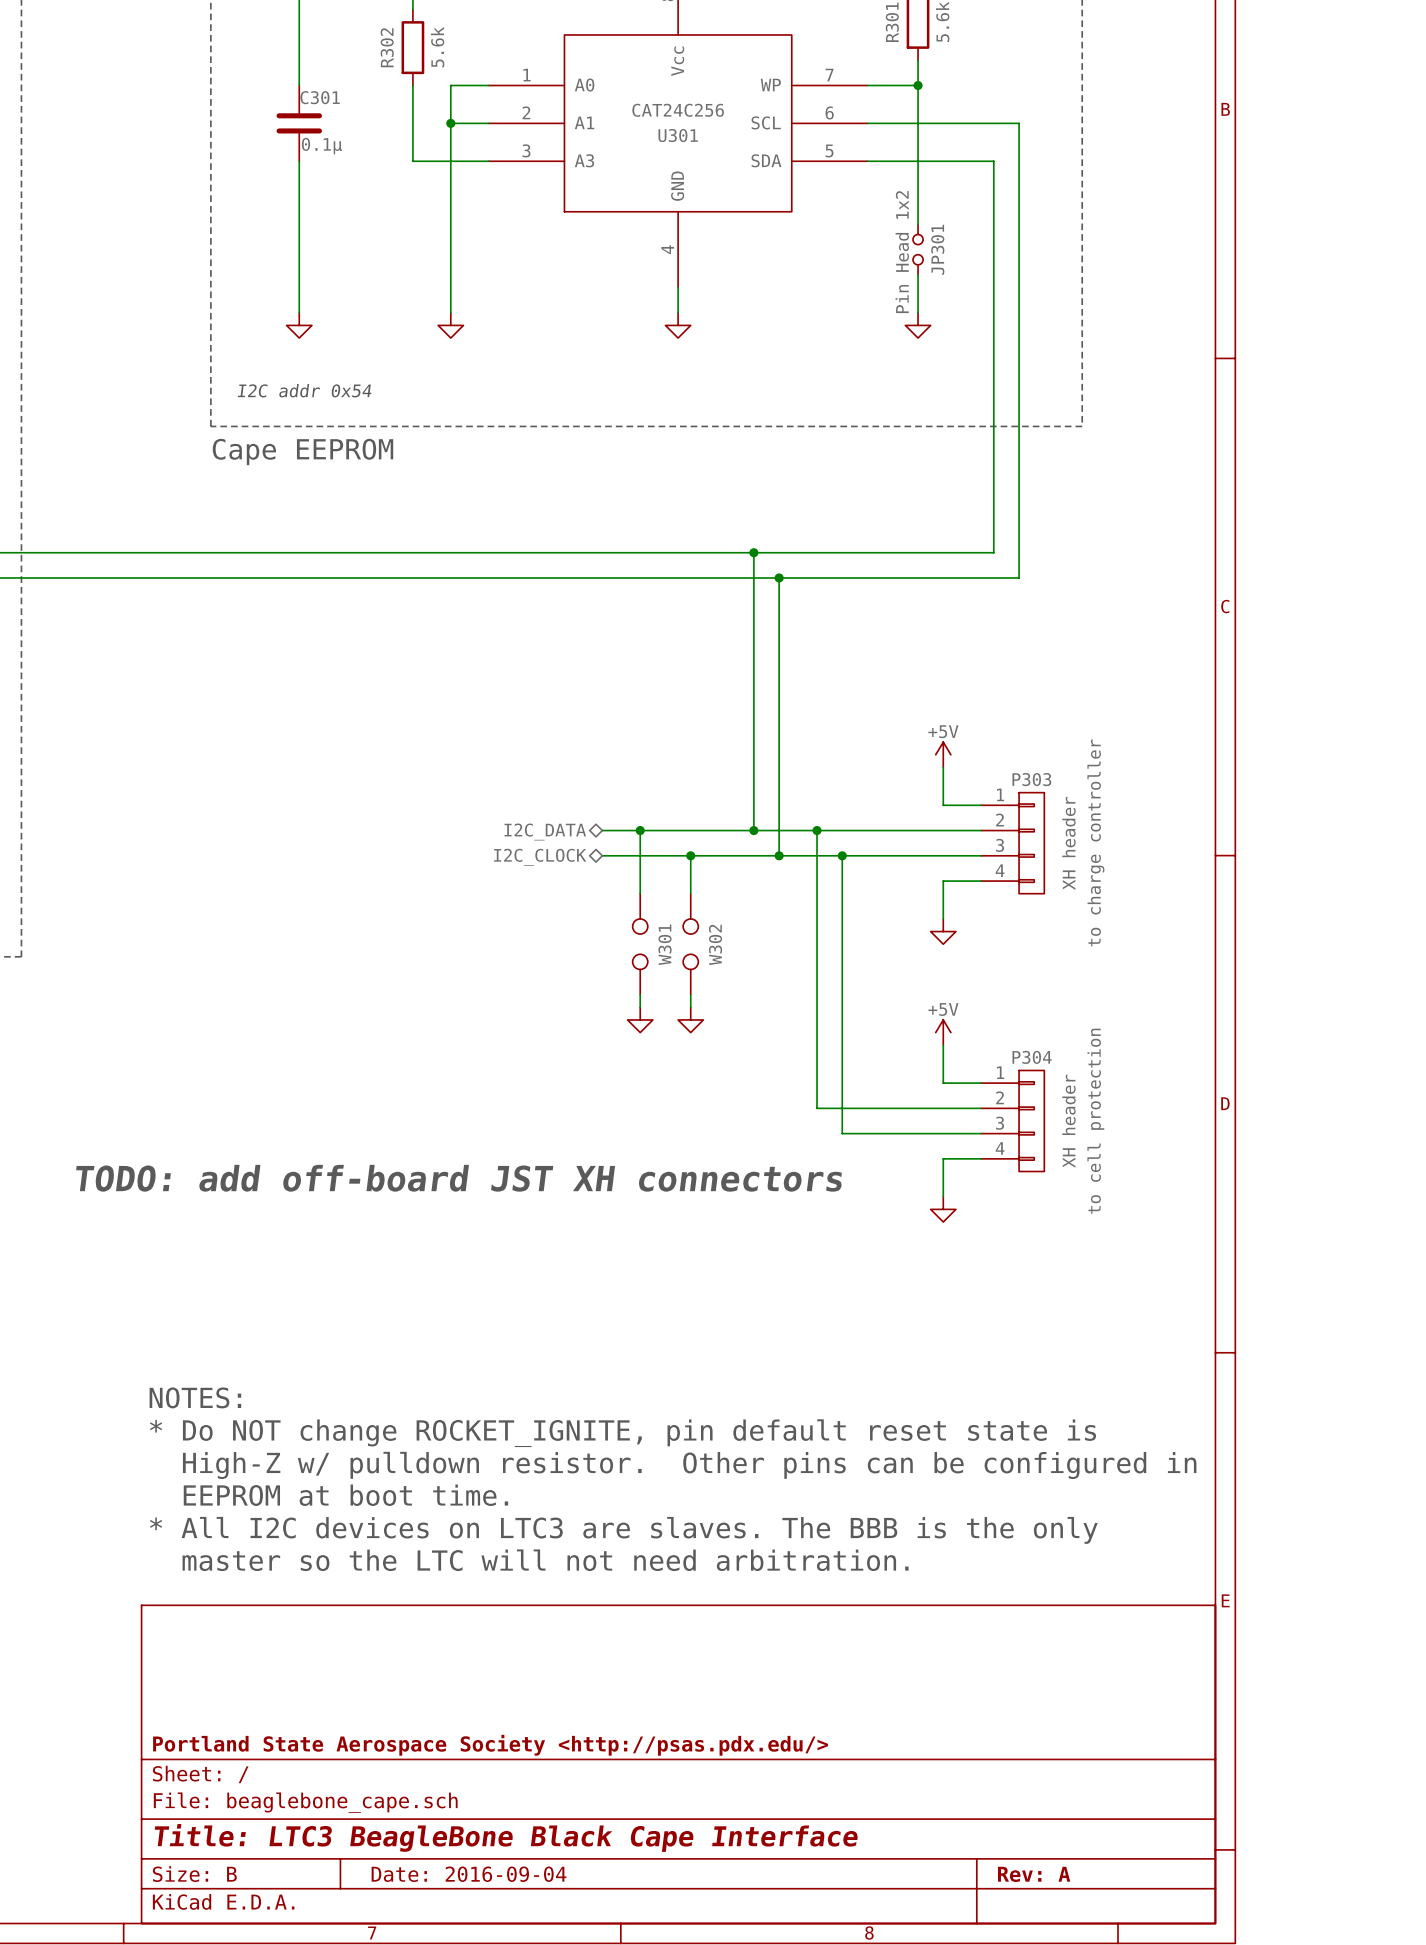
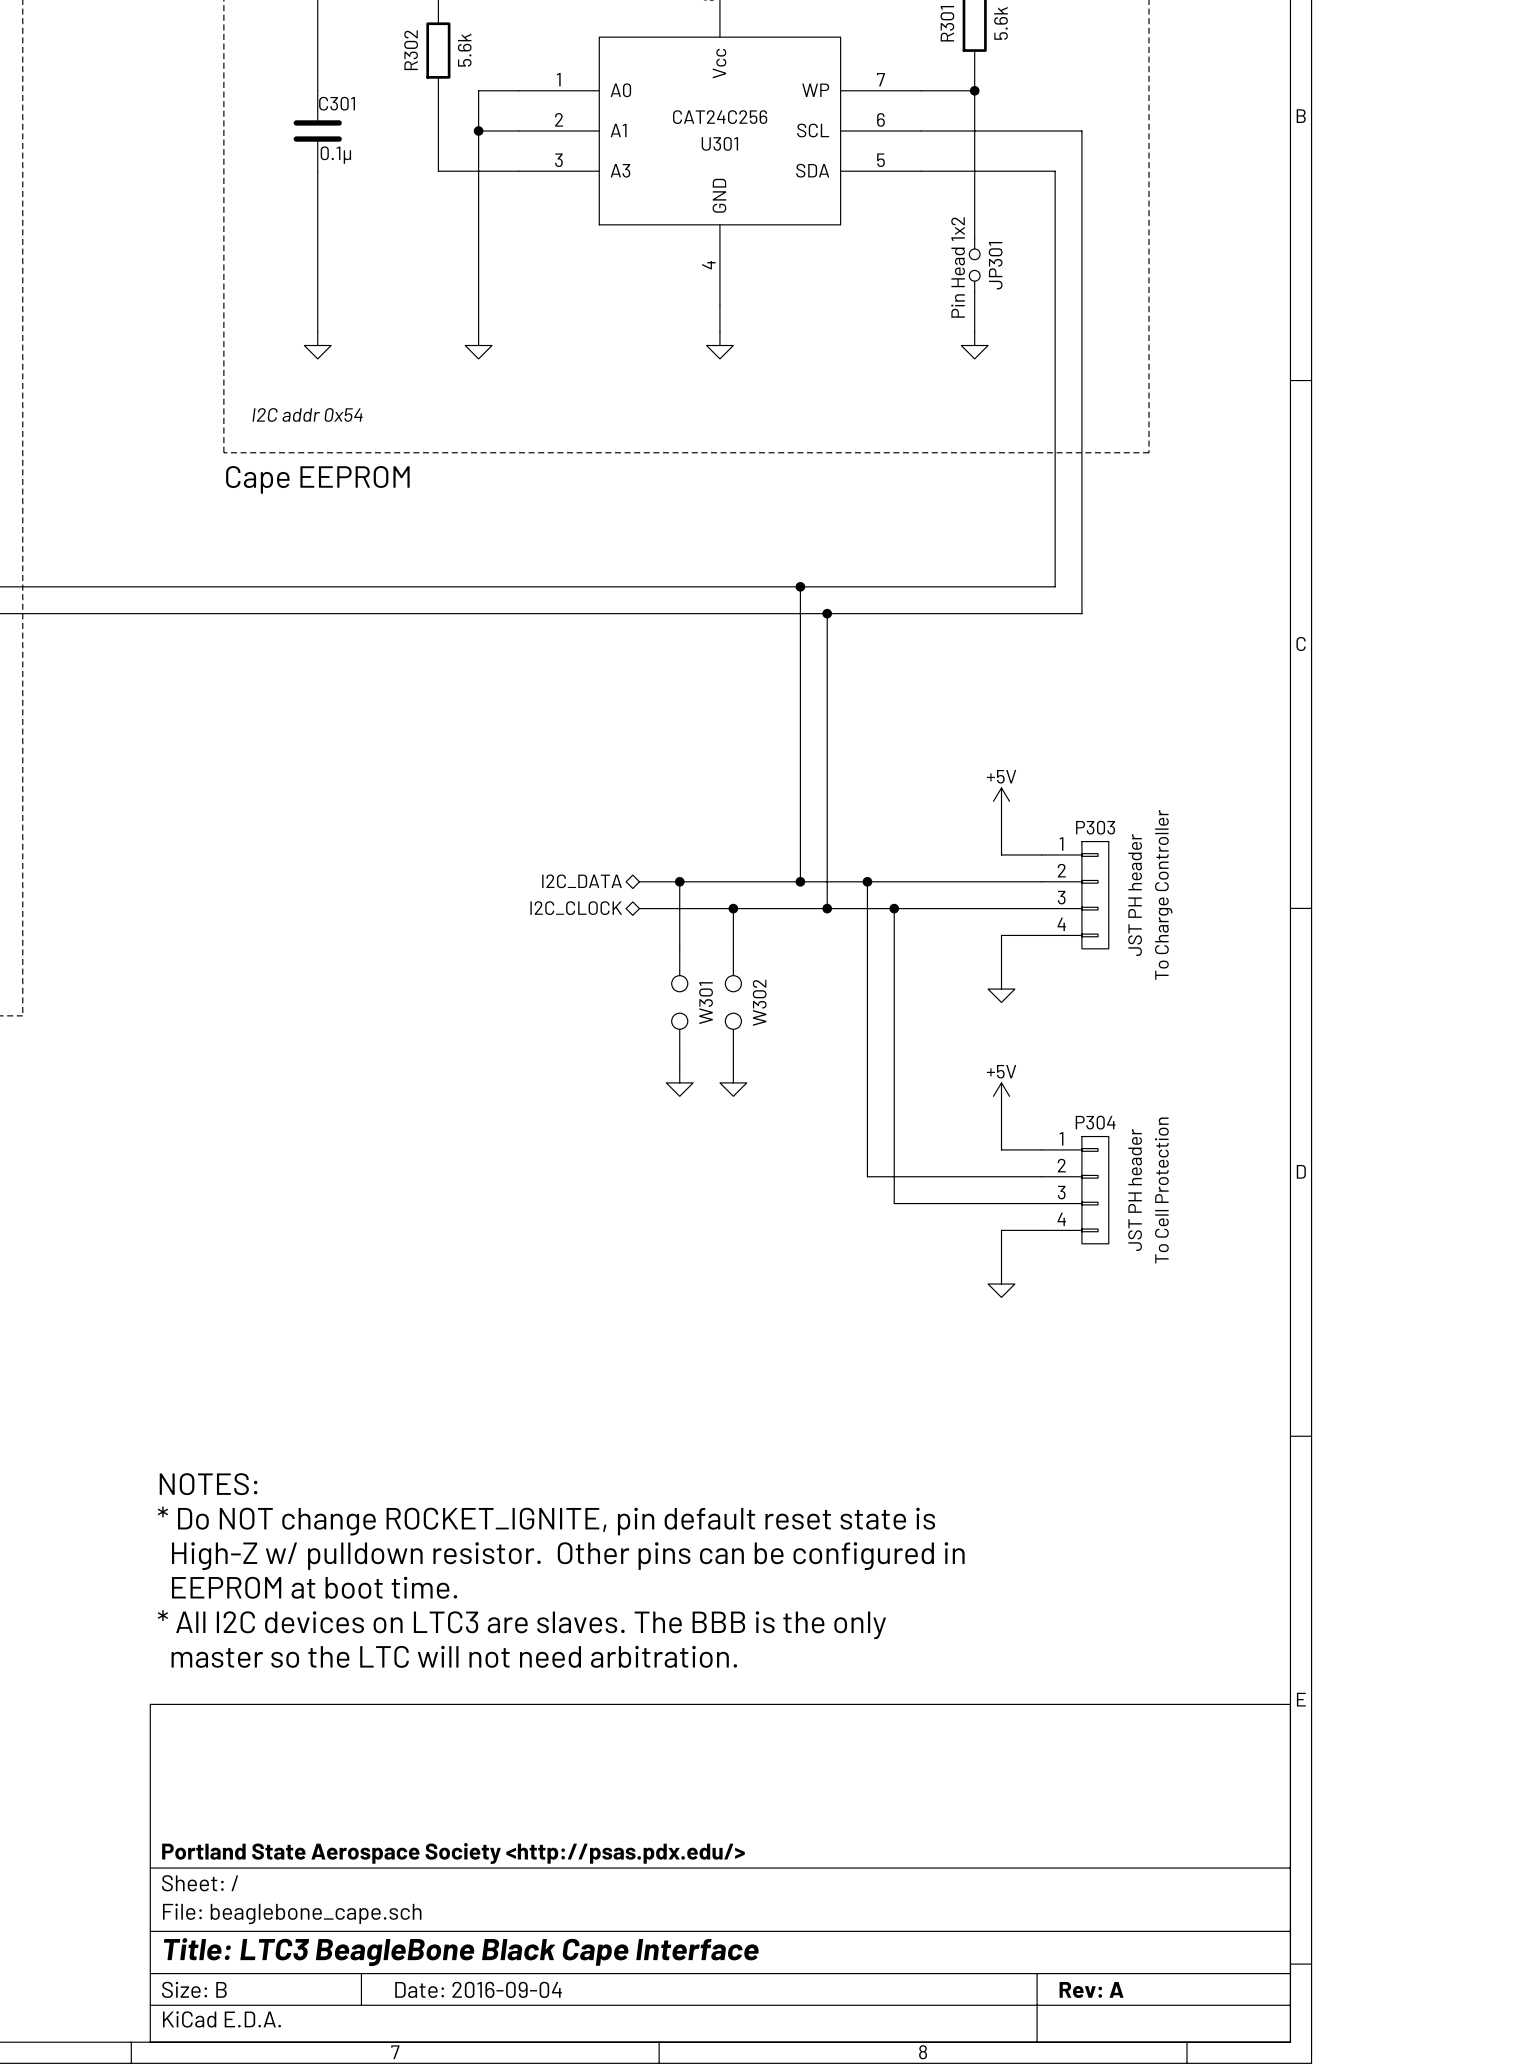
P303 text: to charge controller (1095, 842) -> To Charge Controller (1163, 894)
P303 value: XH header (1068, 843) -> JST PH header (1135, 895)
P304 value: XH header (1068, 1121) -> JST PH header (1135, 1190)
P304 text: to cell protection (1095, 1121) -> To Cell Protection (1161, 1190)
text: TODO: add off-board JST XH connectors (458, 1178) -> none

